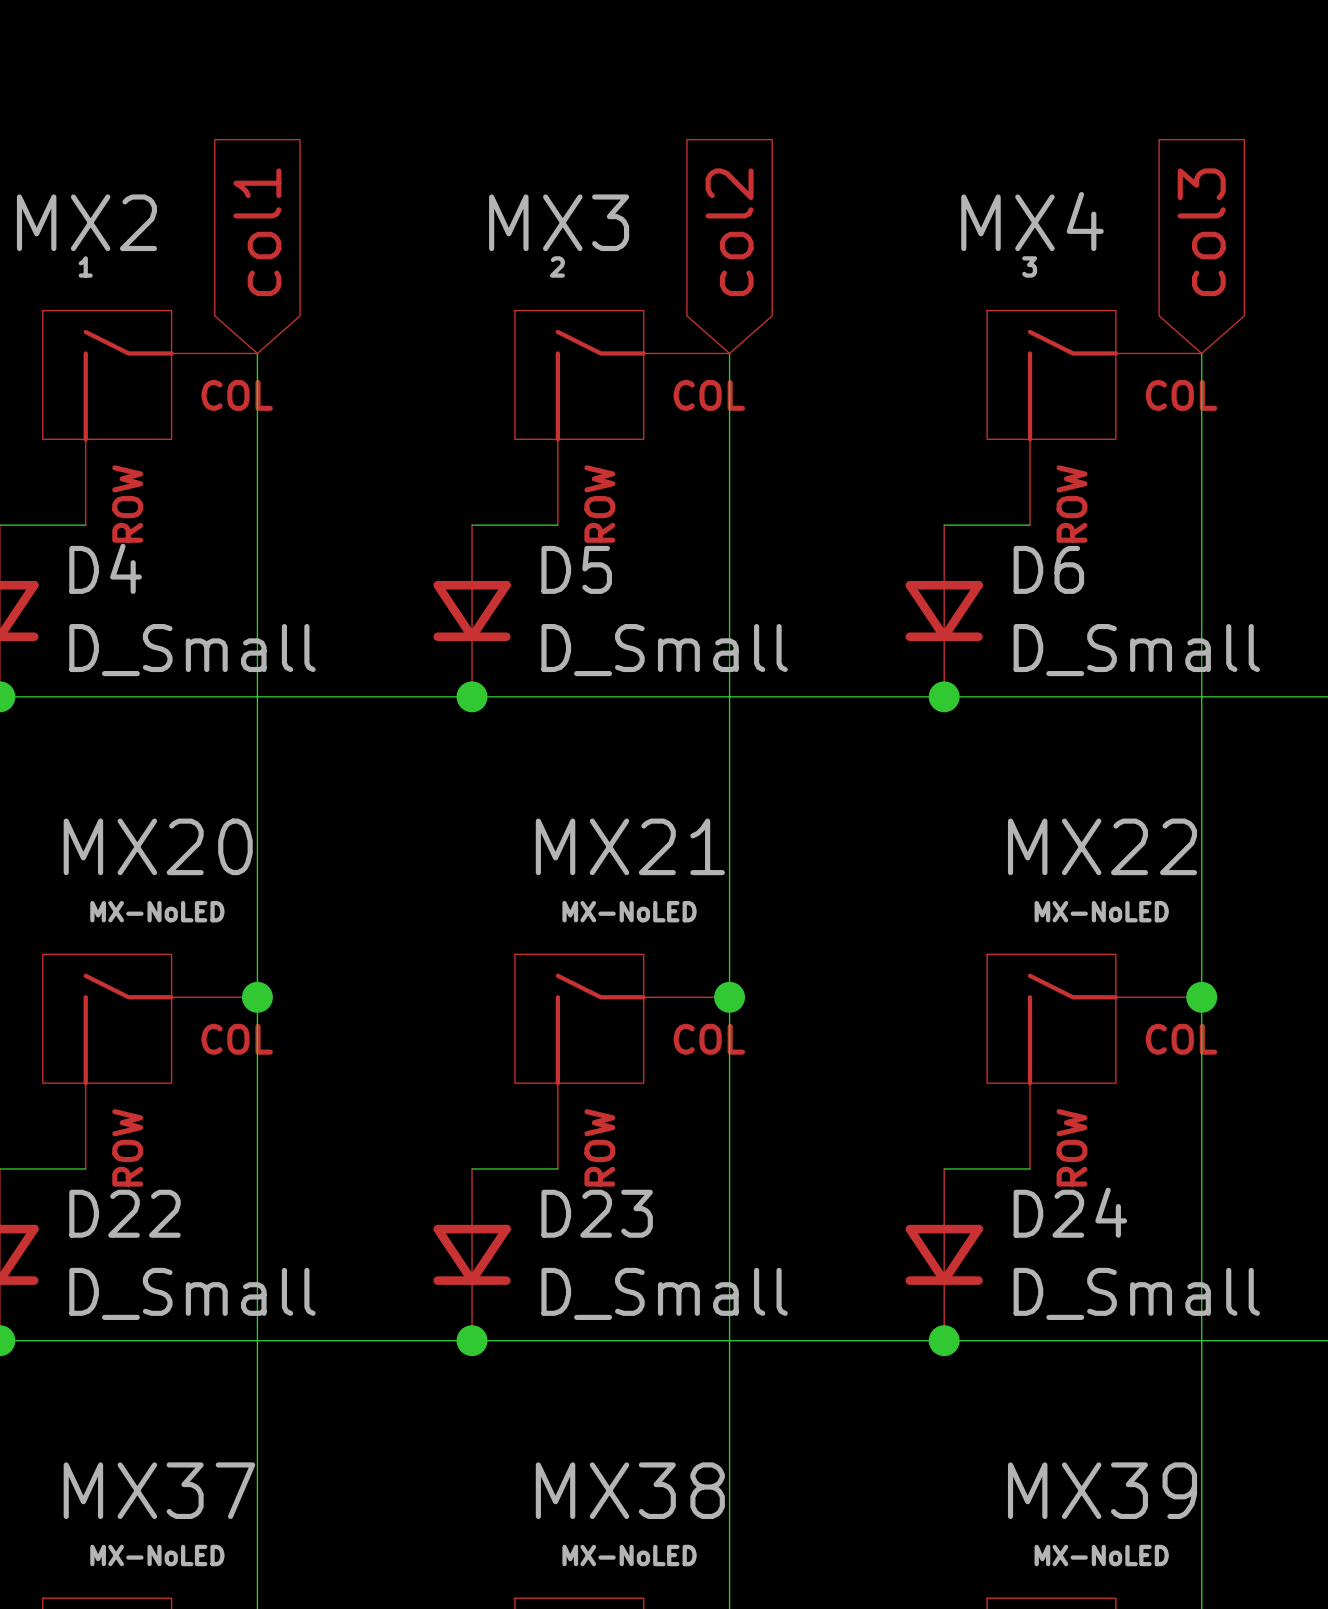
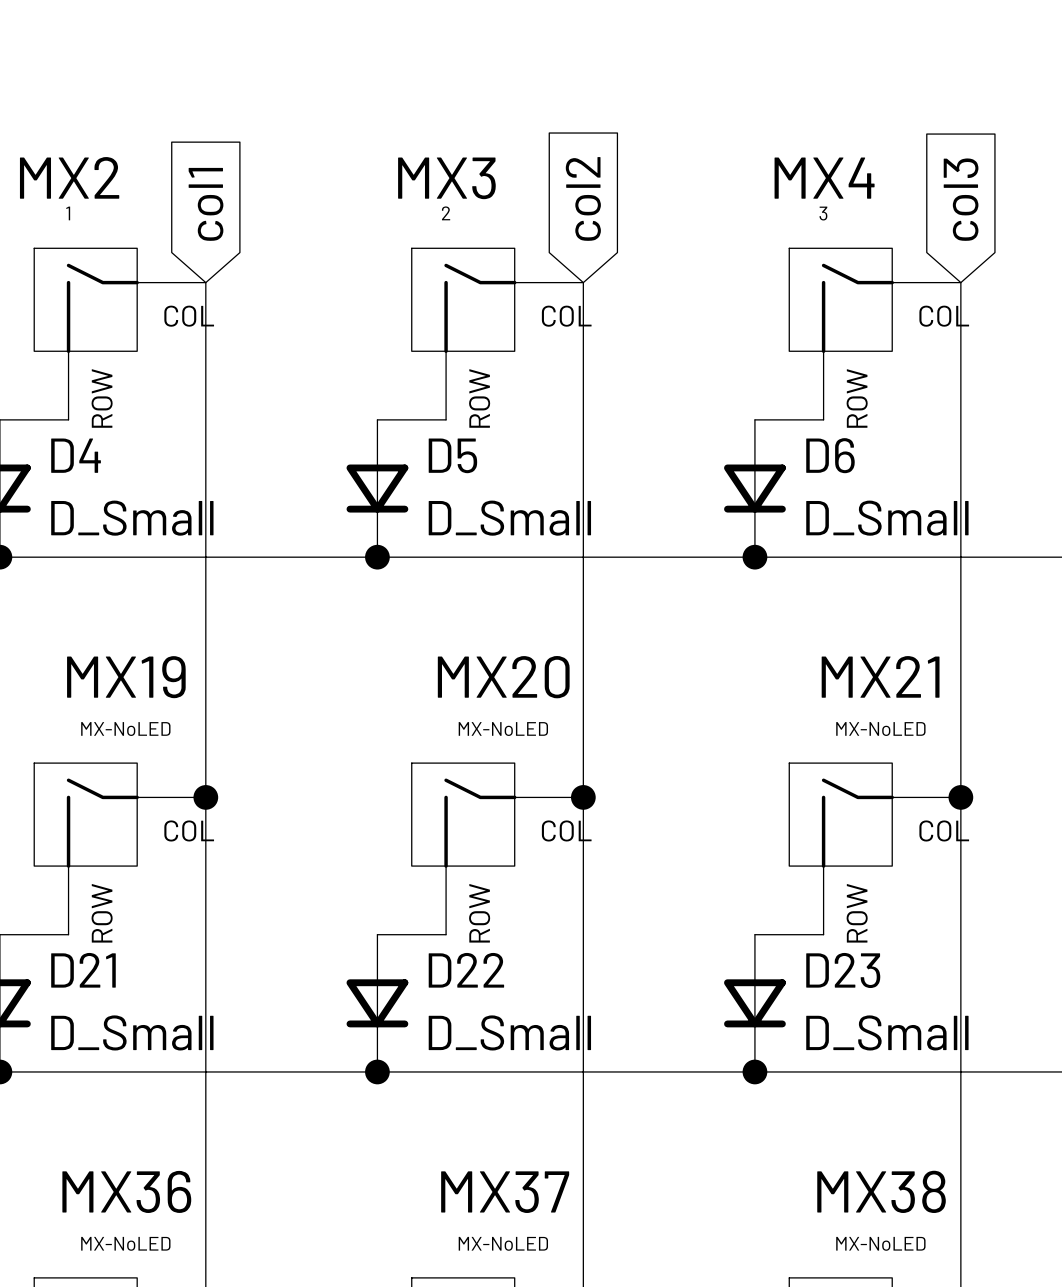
MX20 name: MX20 (158, 846) -> MX19 (126, 677)
MX21 name: MX21 (630, 846) -> MX20 (503, 677)
MX22 name: MX22 (1102, 846) -> MX21 (880, 676)
D24 name: D24 (1070, 1212) -> D23 (843, 970)
D22 name: D22 (125, 1213) -> D21 (83, 970)
D23 name: D23 (597, 1213) -> D22 (466, 970)
MX37 name: MX37 (159, 1490) -> MX36 (126, 1191)
MX38 name: MX38 (630, 1490) -> MX37 (505, 1192)
MX39 name: MX39 (1102, 1490) -> MX38 (881, 1191)

